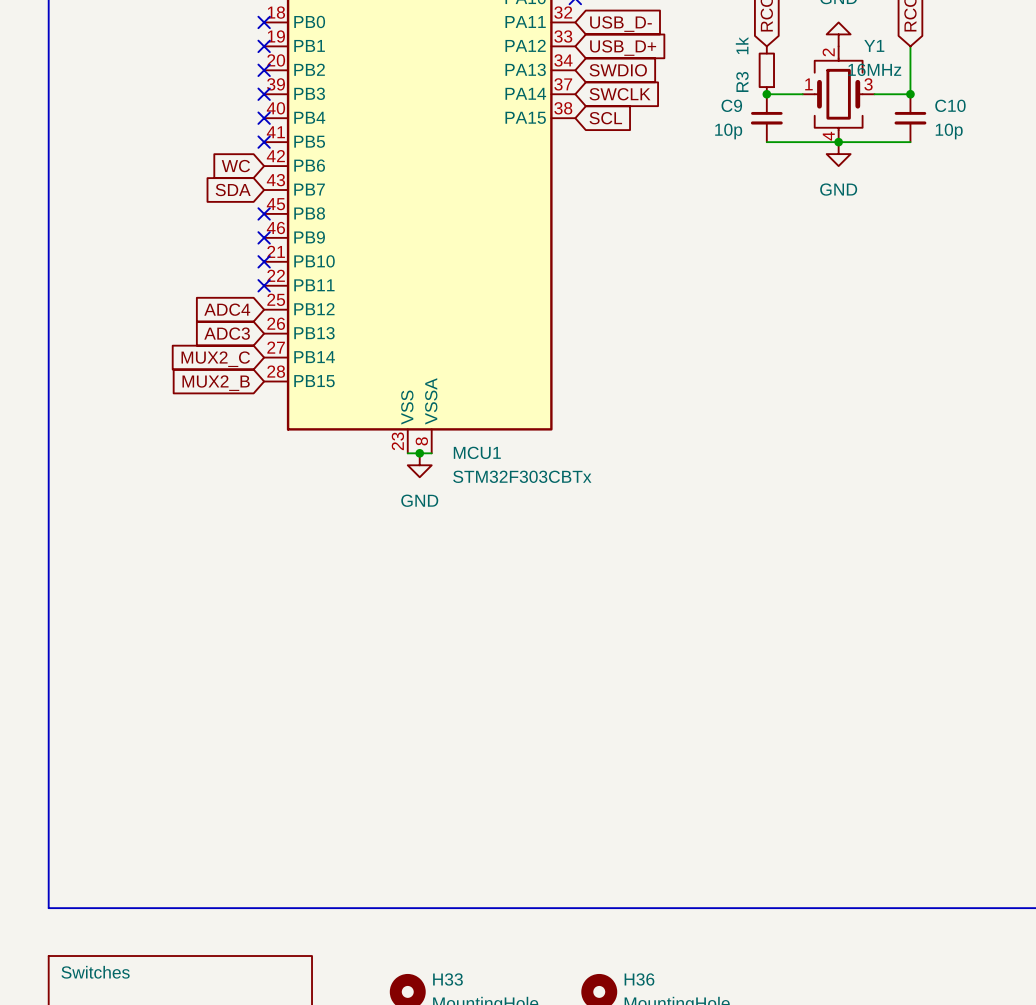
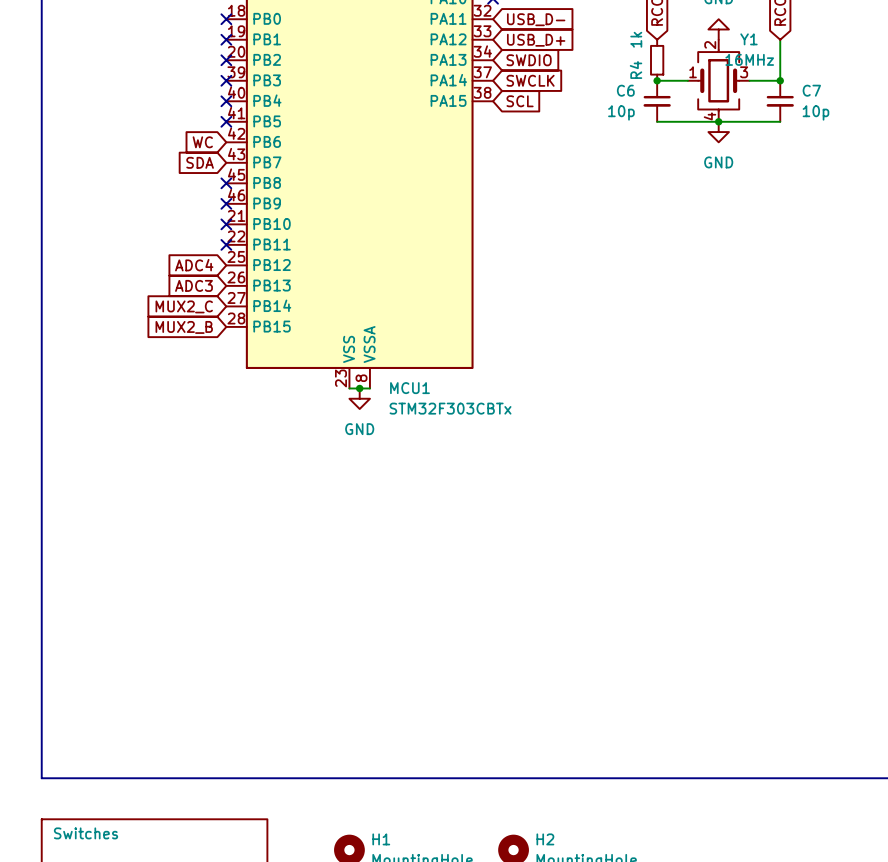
R3 name: R3 (742, 81) -> R4 (636, 70)
C9 name: C9 (731, 105) -> C6 (625, 90)
C10 name: C10 (950, 105) -> C7 (811, 90)
H33 name: H33 (447, 979) -> H1 (381, 839)
H36 name: H36 (639, 979) -> H2 (545, 839)

